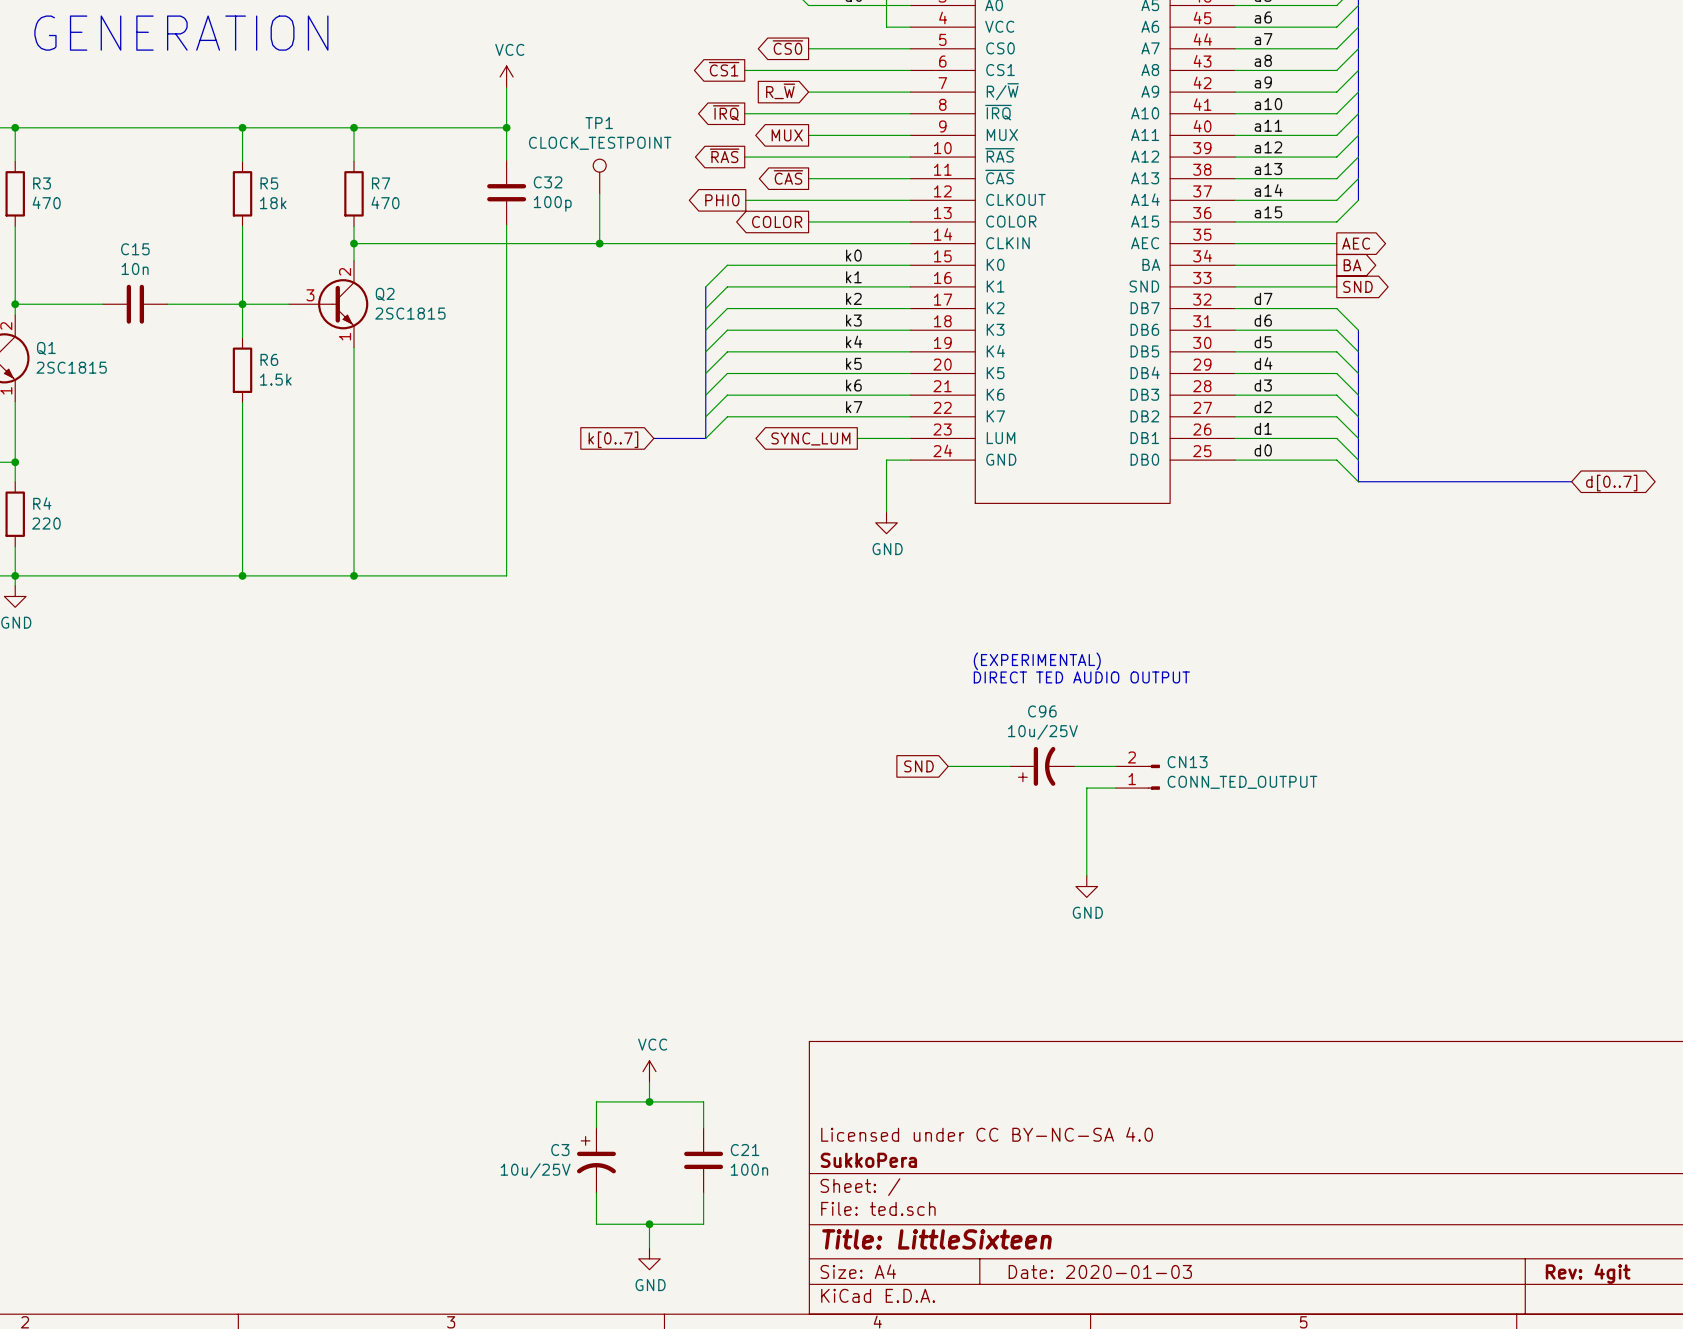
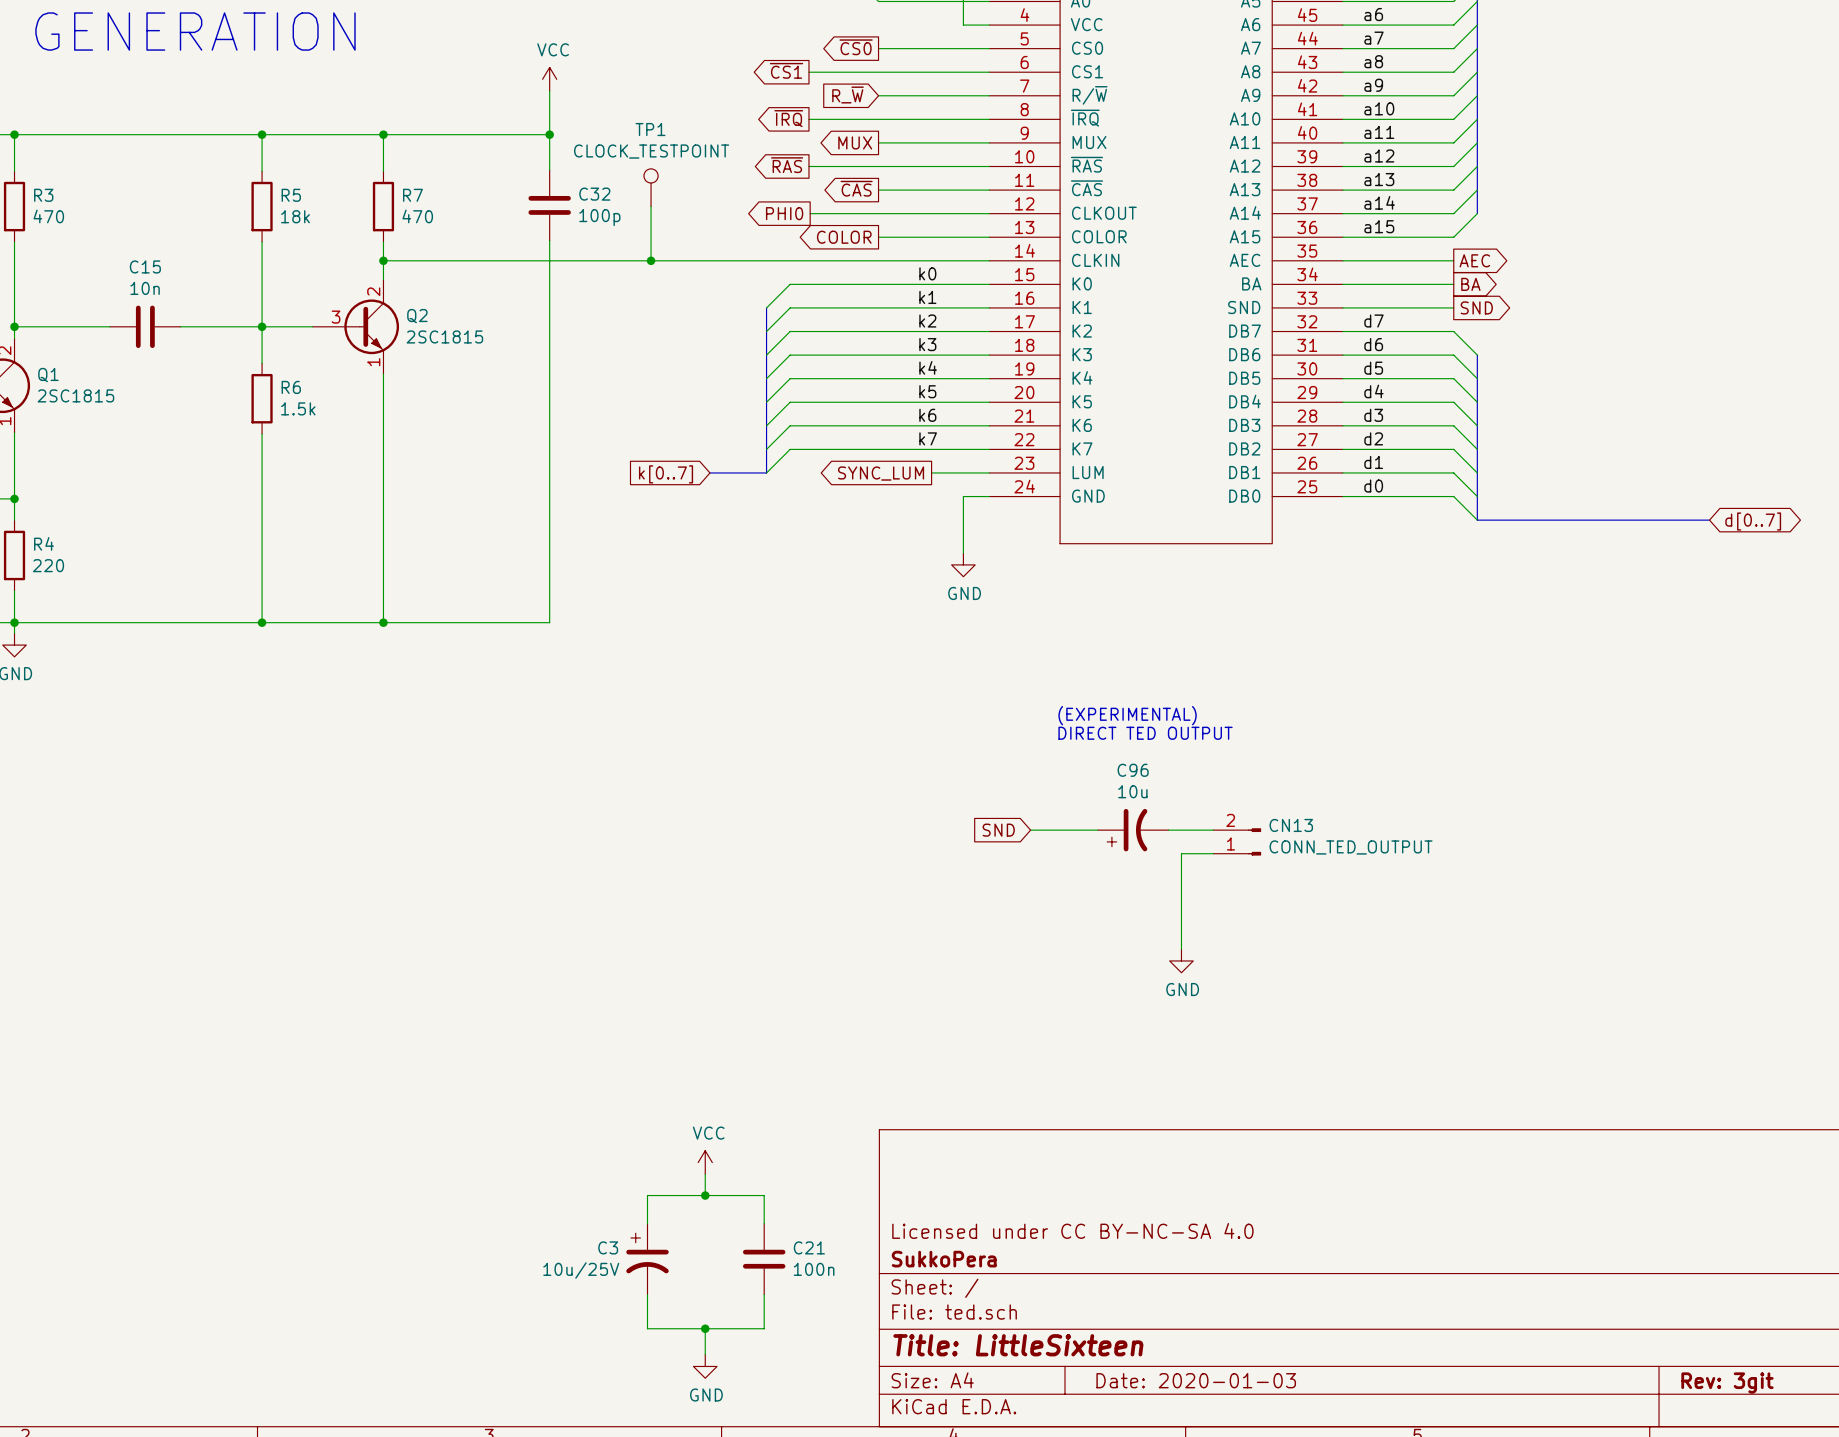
text: DIRECT TED AUDIO OUTPUT (1081, 677) -> DIRECT TED OUTPUT (1145, 733)
C96 value: 10u/25V (1042, 732) -> 10u (1132, 791)
title block: Rev: 4git (1588, 1273) -> Rev: 3git (1727, 1383)

